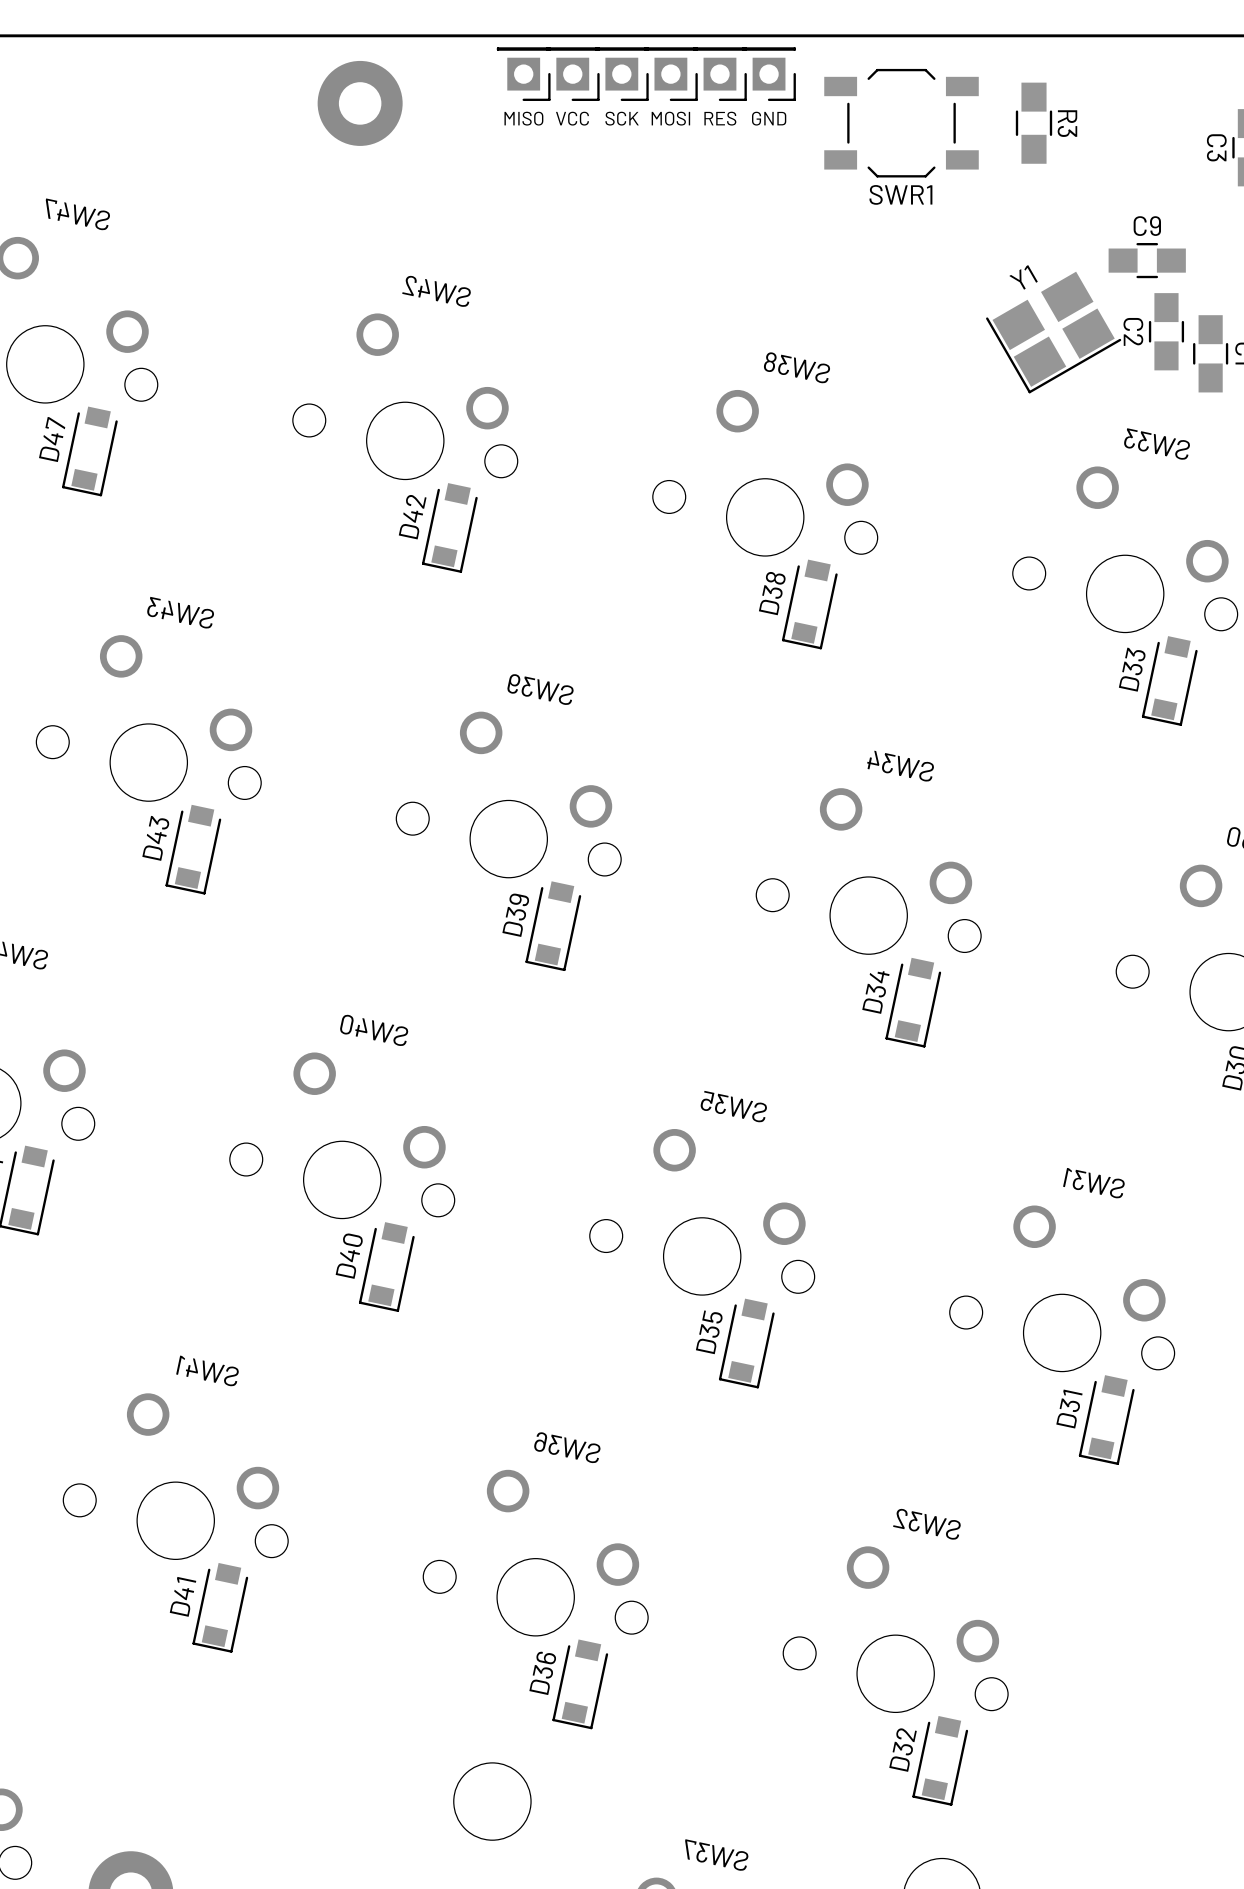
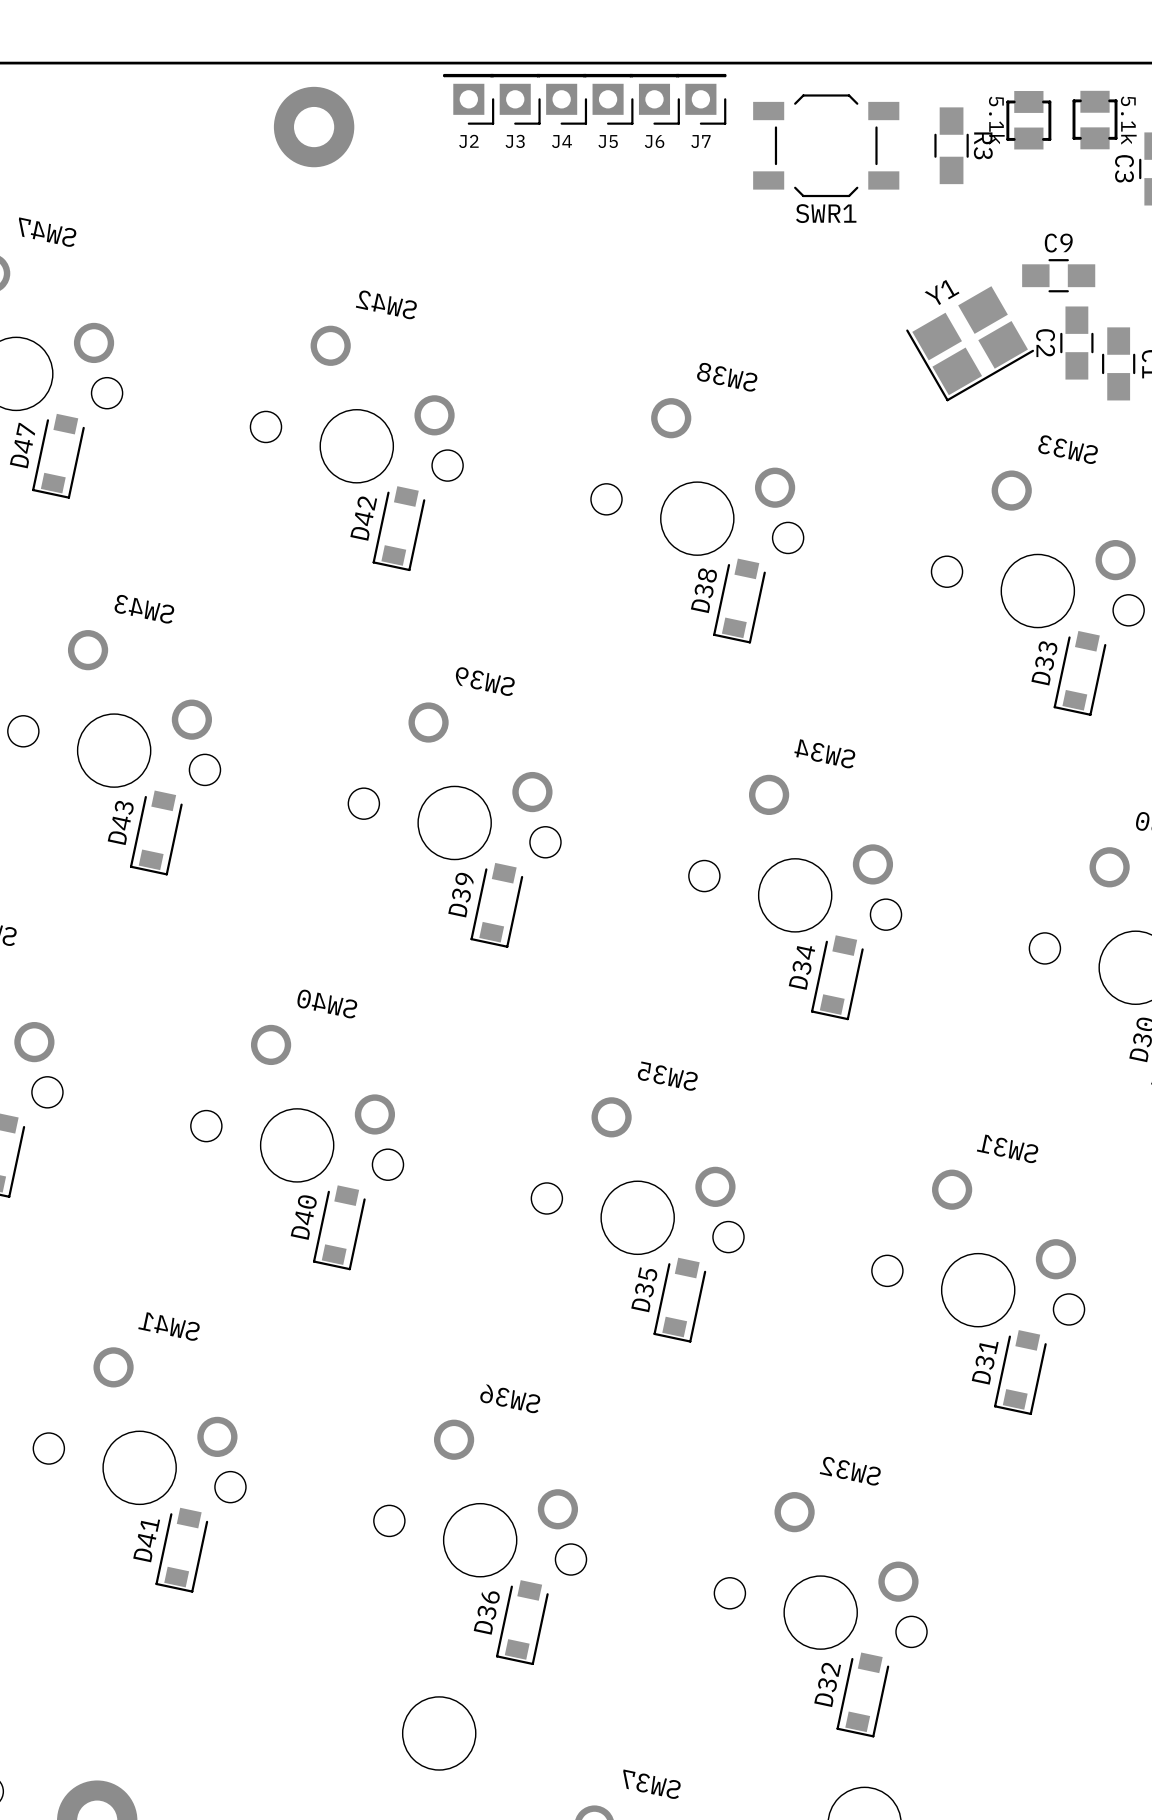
part: none -> 5.1k (1028, 120)
part: none -> 5.1k (1095, 120)
MISO name: MISO (523, 118) -> J2 (468, 141)
VCC name: VCC (572, 118) -> J3 (515, 141)
SCK name: SCK (622, 118) -> J4 (561, 141)
MOSI name: MOSI (670, 118) -> J5 (608, 141)
RES name: RES (720, 118) -> J6 (654, 141)
GND name: GND (769, 118) -> J7 (700, 141)

